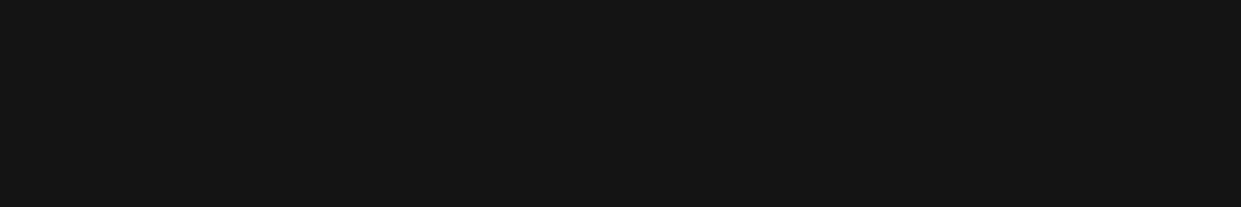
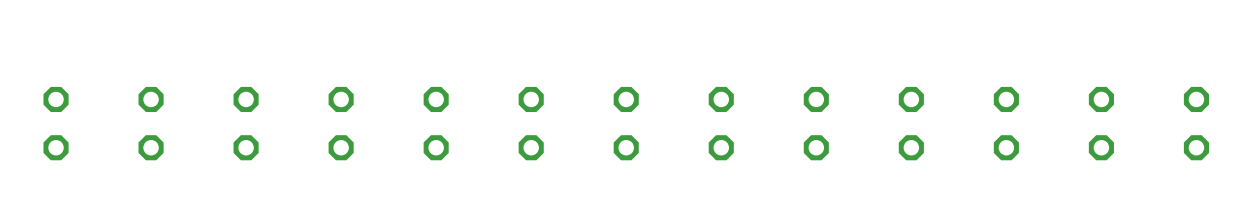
part: none -> (56, 123)
part: none -> (151, 123)
part: none -> (246, 123)
part: none -> (341, 123)
part: none -> (436, 123)
part: none -> (531, 123)
part: none -> (626, 123)
part: none -> (721, 123)
part: none -> (816, 123)
part: none -> (911, 123)
part: none -> (1006, 123)
part: none -> (1101, 123)
part: none -> (1196, 123)

